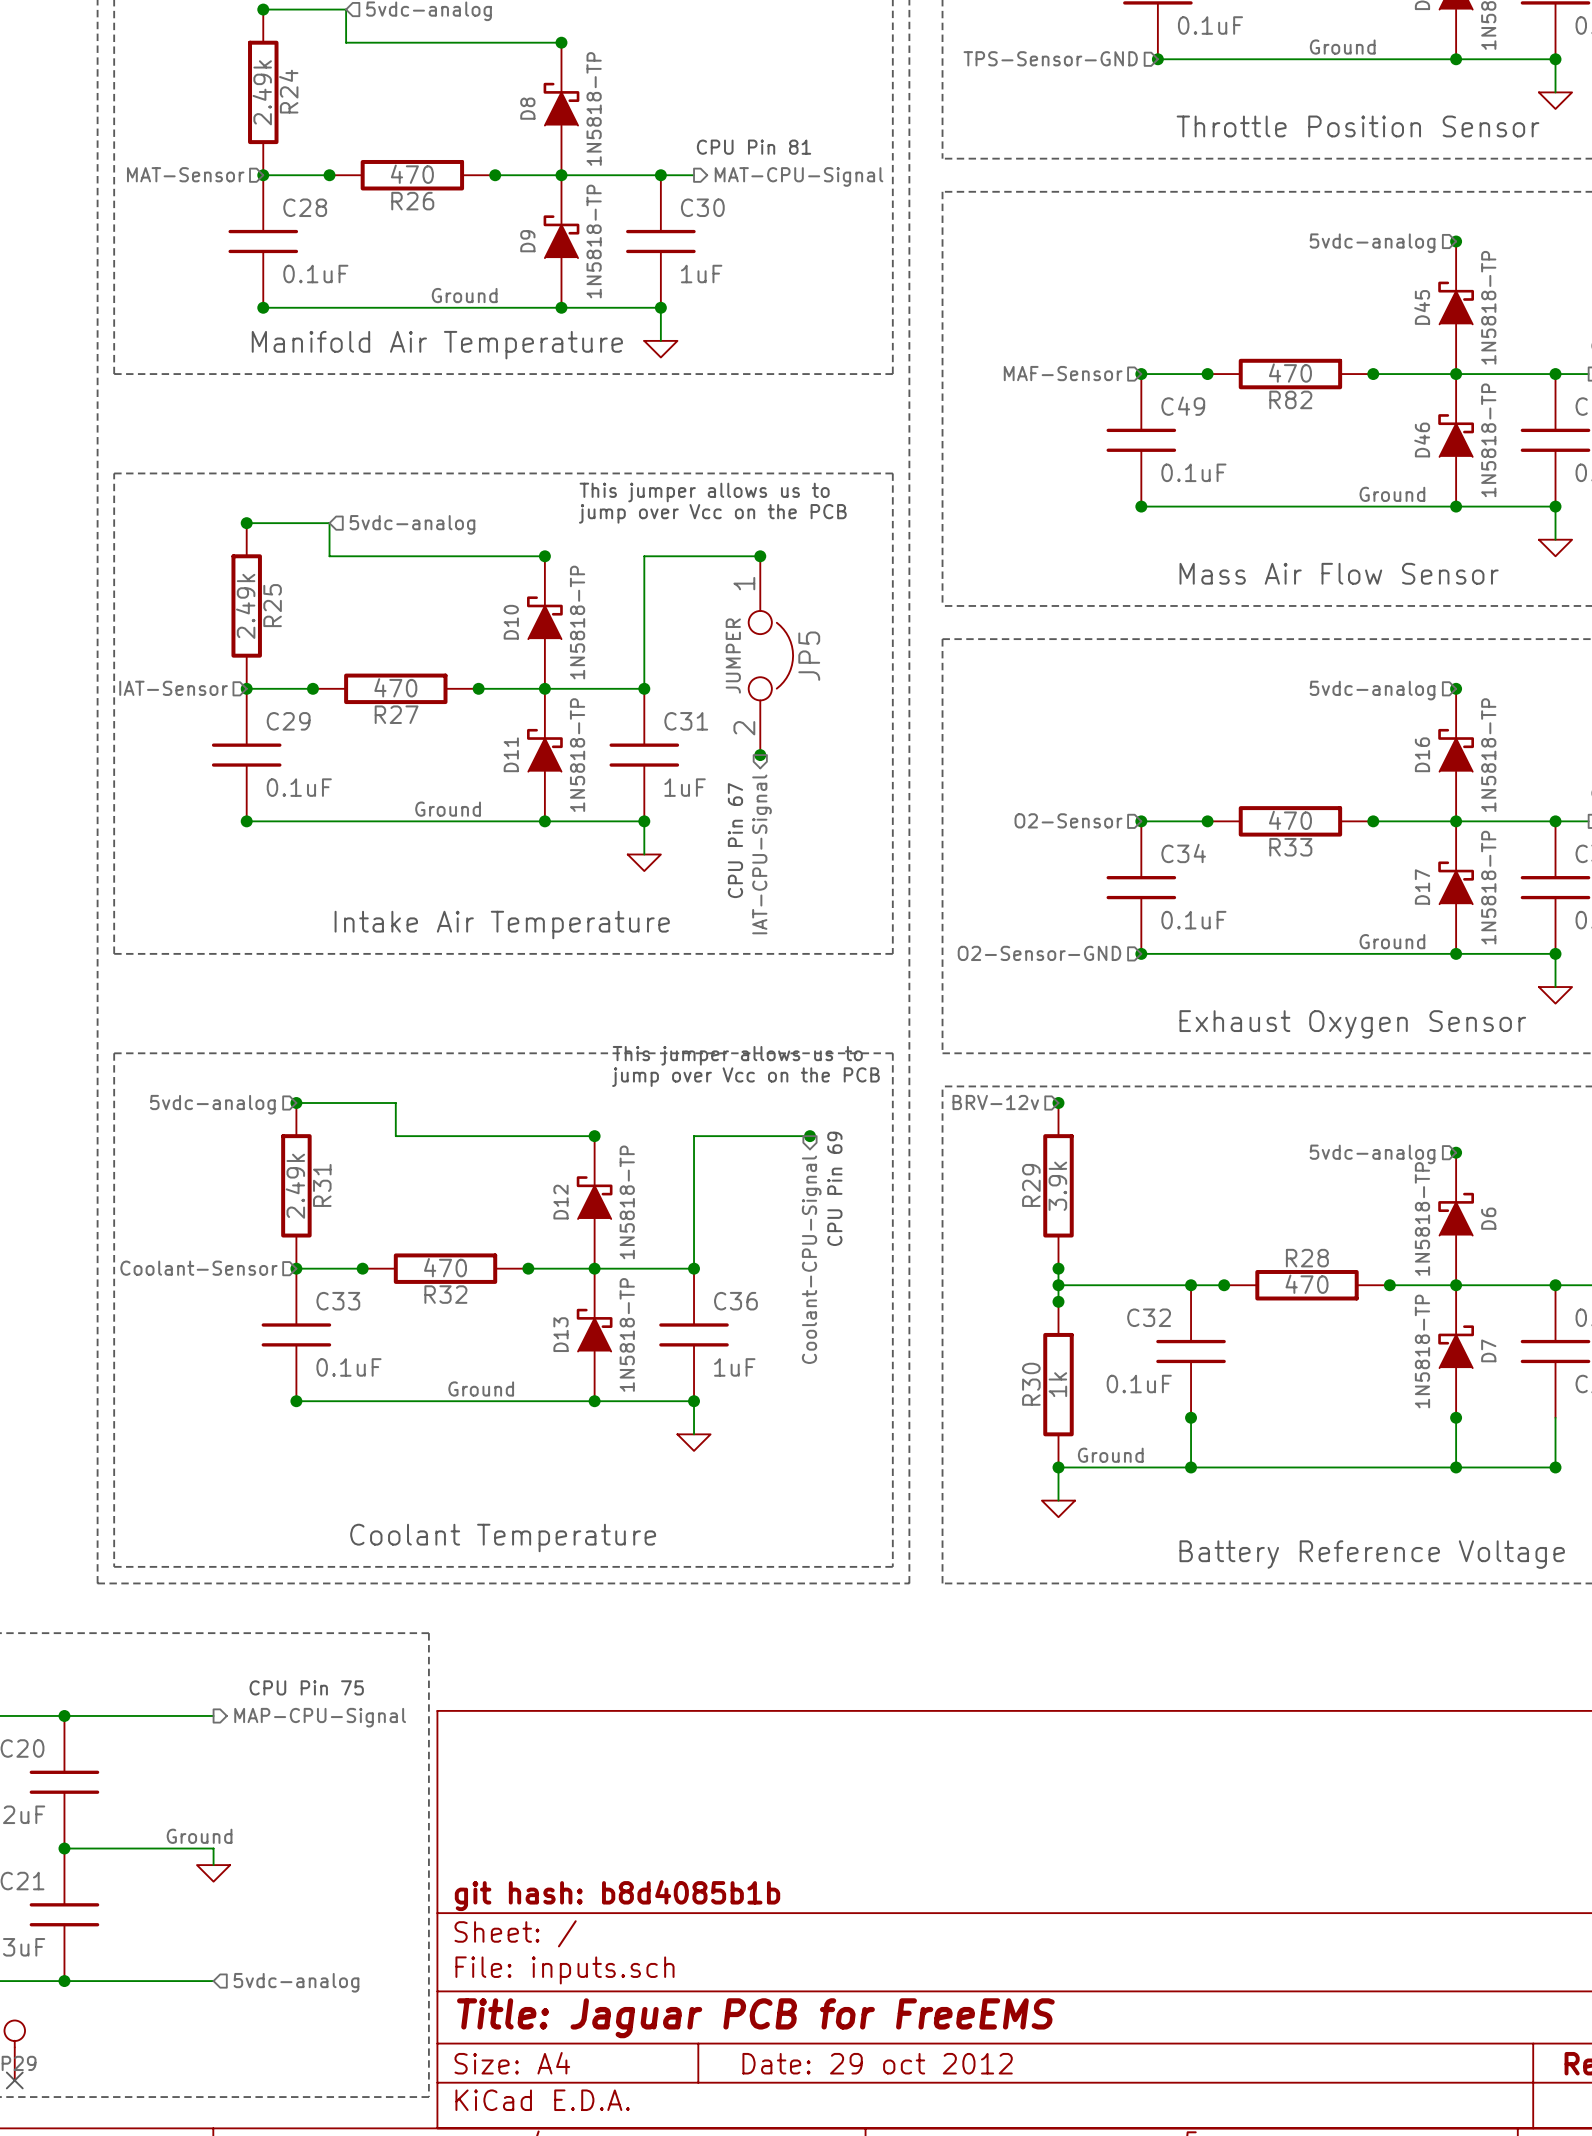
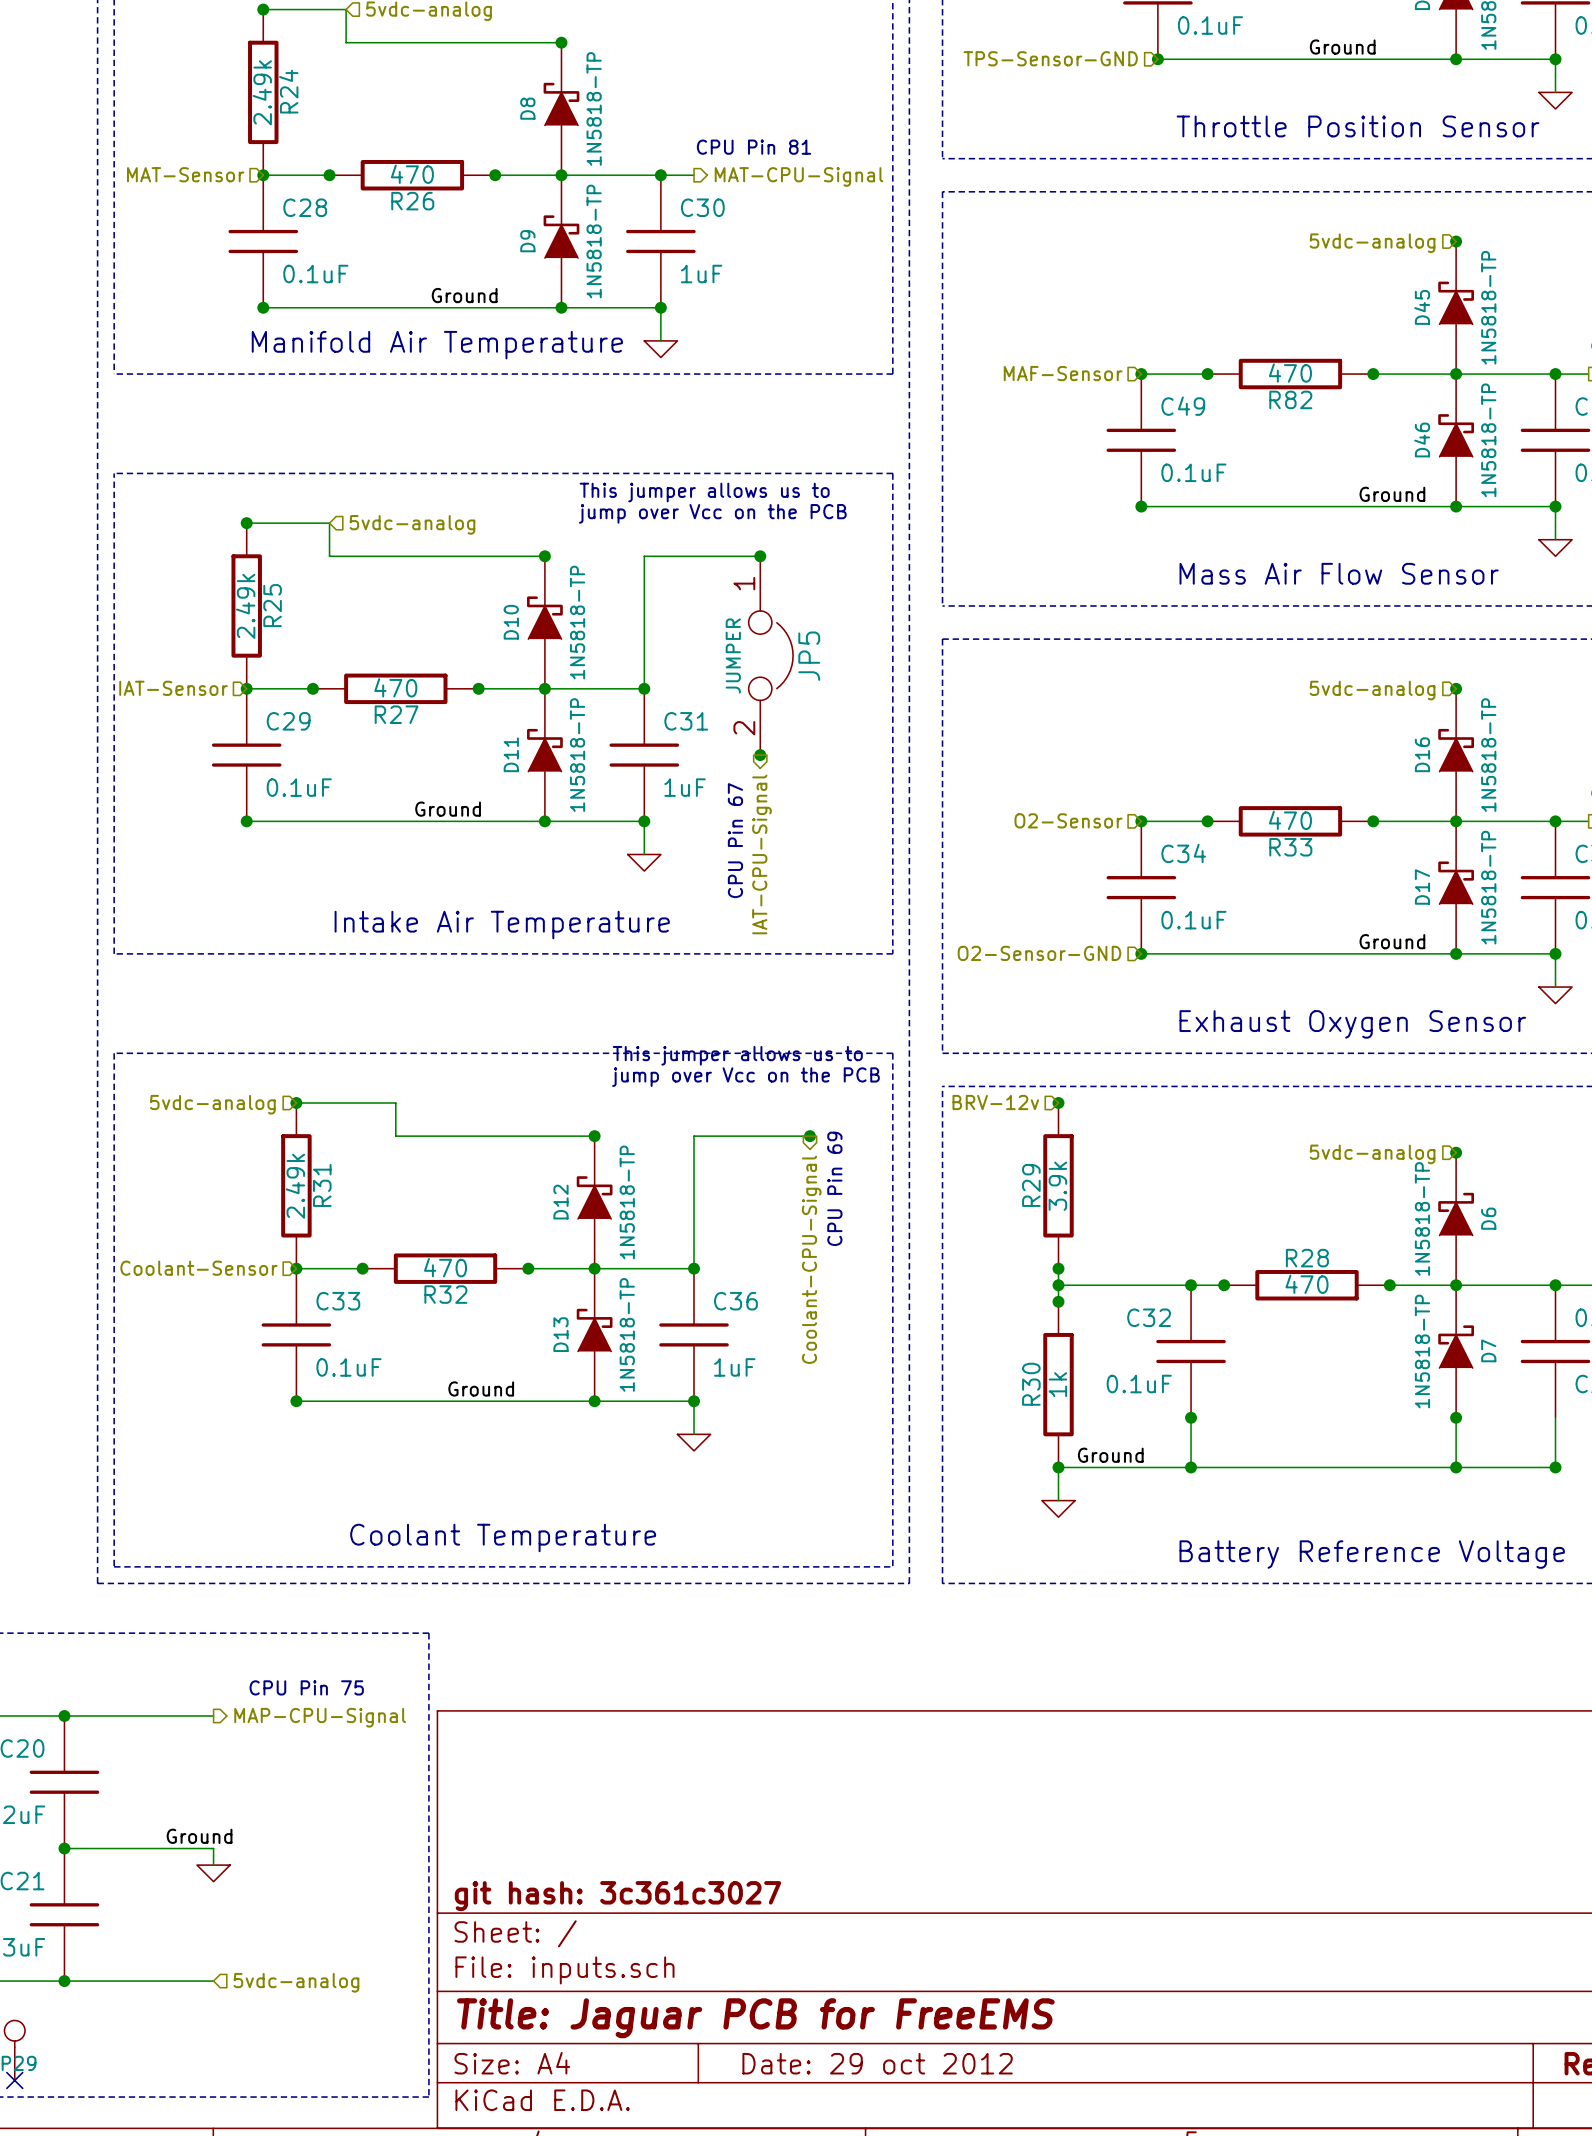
title block: git hash: b8d4085b1b (617, 1895) -> git hash: 3c361c3027 (617, 1896)

